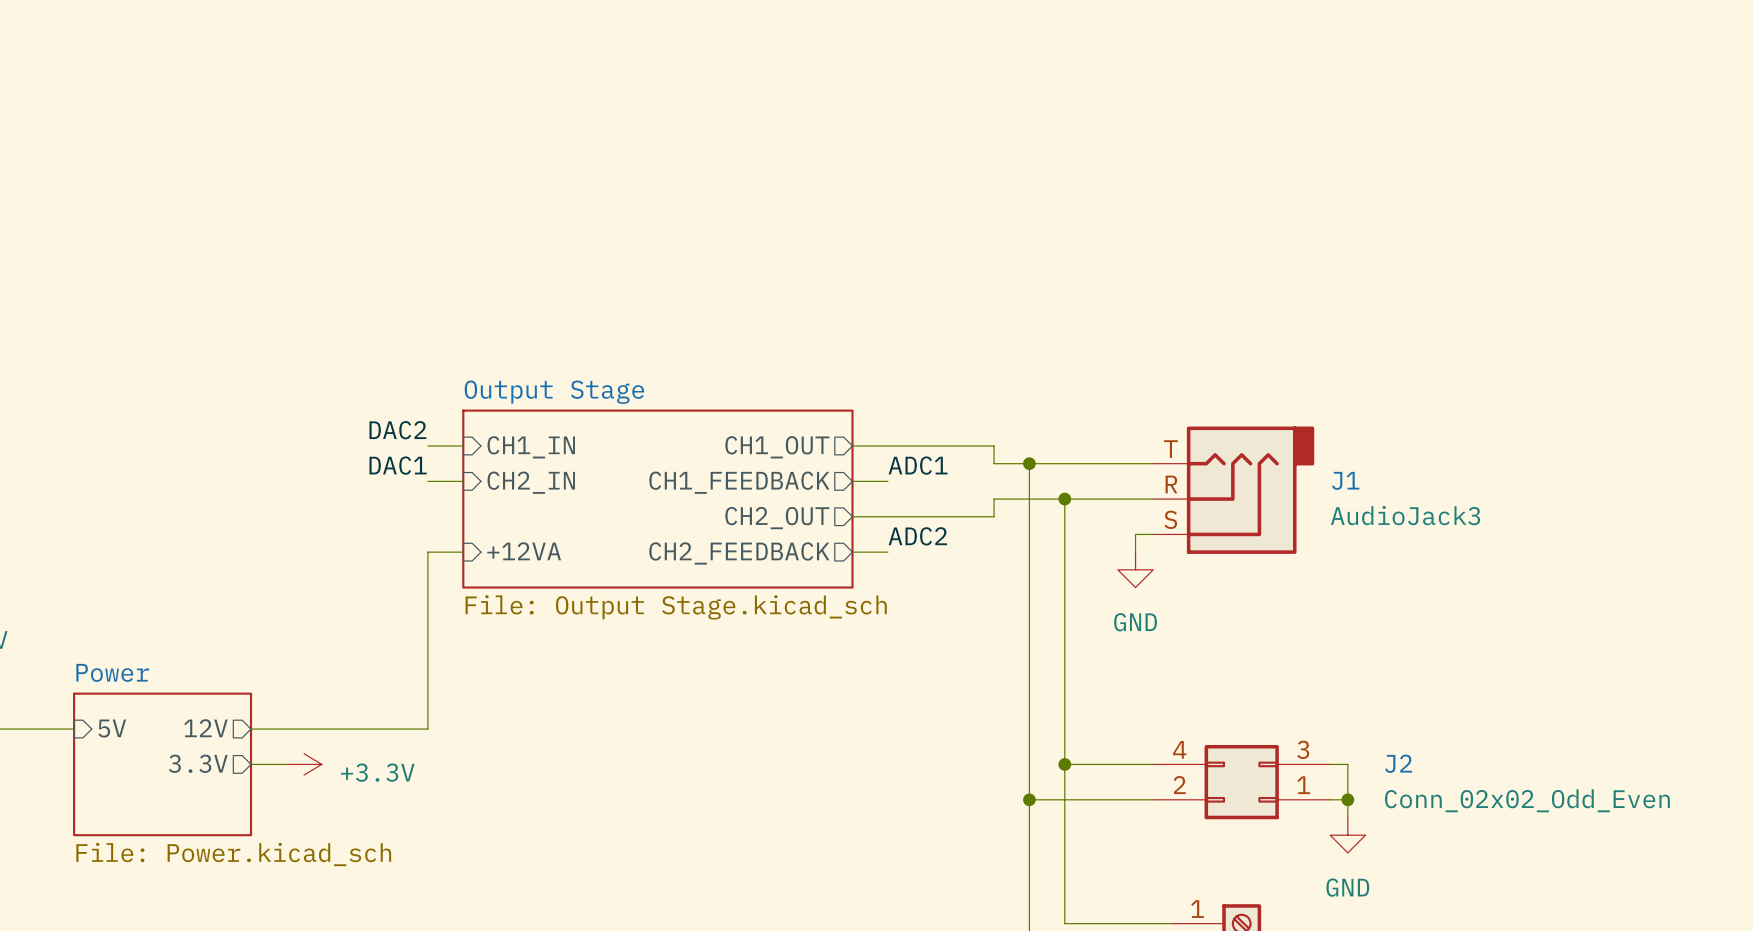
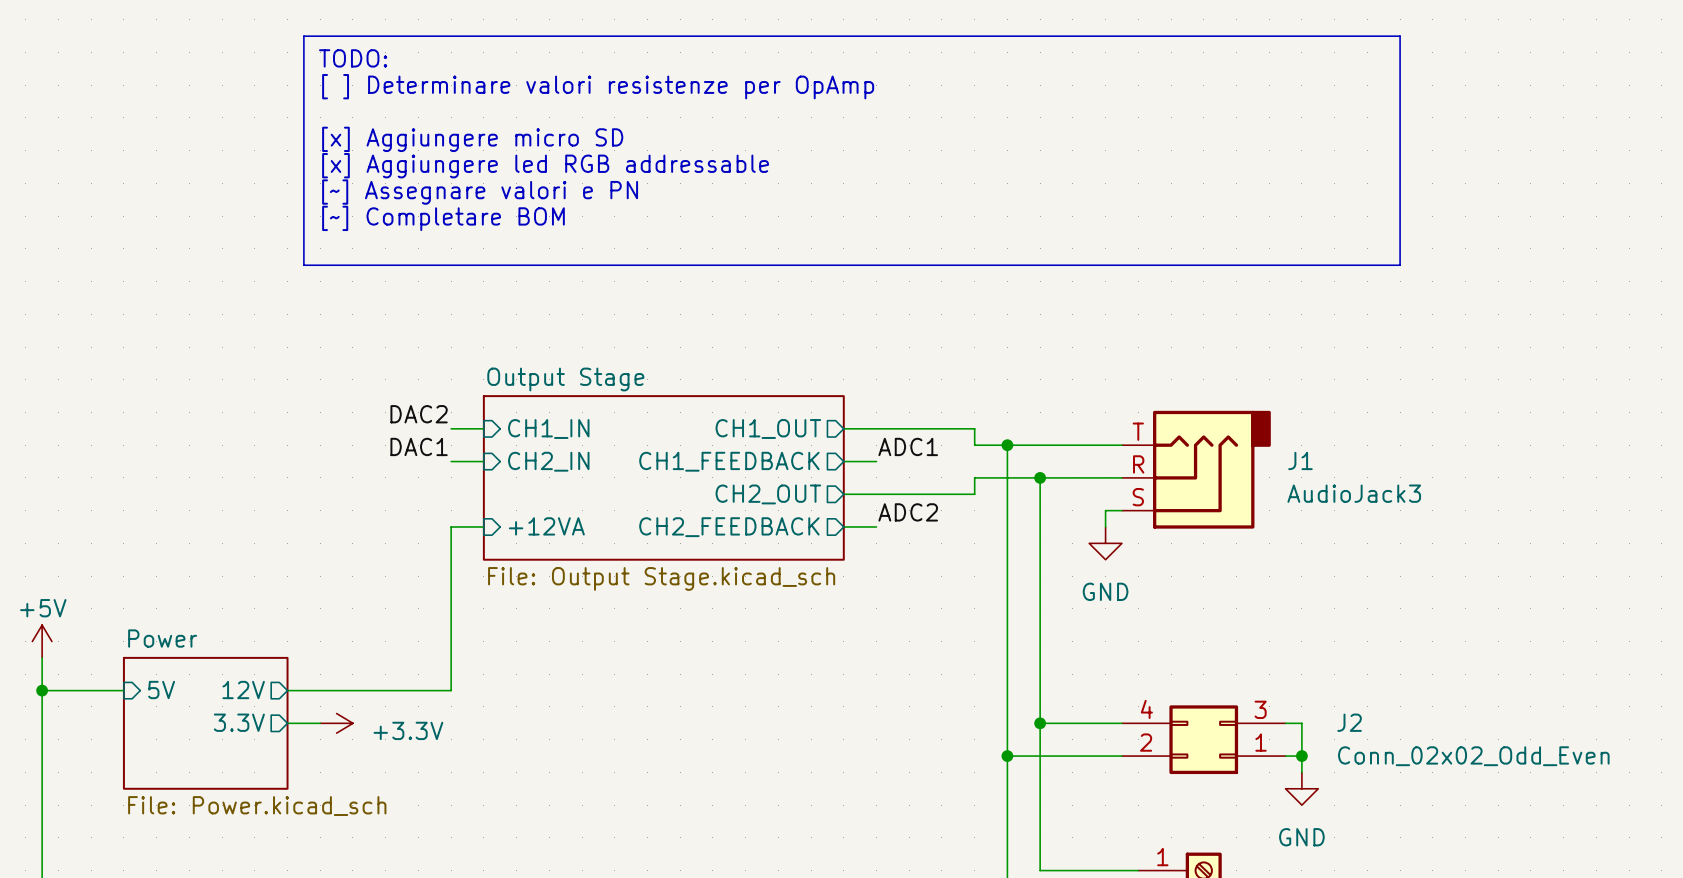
line: none -> (303, 36) (1400, 36) (1400, 265) (303, 265) (303, 36)
text: none -> TODO: (353, 58)
text: none -> [ ] Determinare valori resistenze per OpAmp (598, 86)
text: none -> [x] Aggiungere micro SD (472, 139)
text: none -> [x] Aggiungere led RGB addressable (545, 165)
text: none -> [~] Assegnare valori e PN (480, 192)
text: none -> [~] Completare BOM (443, 218)

